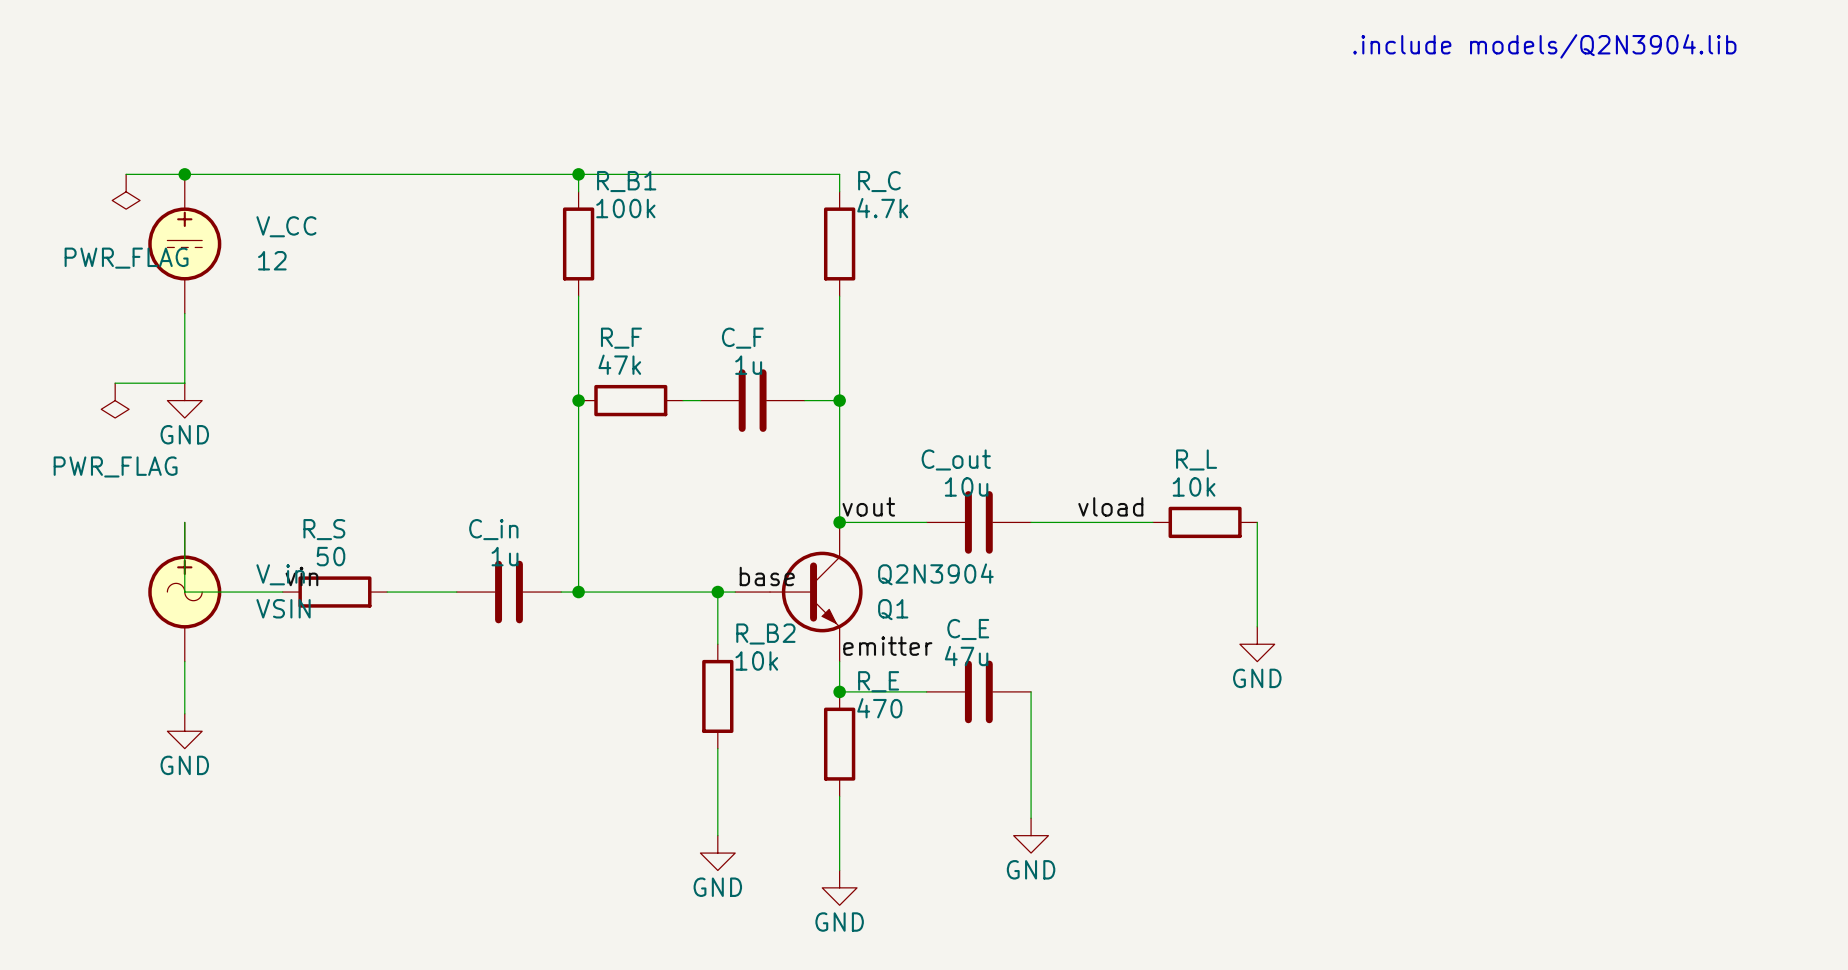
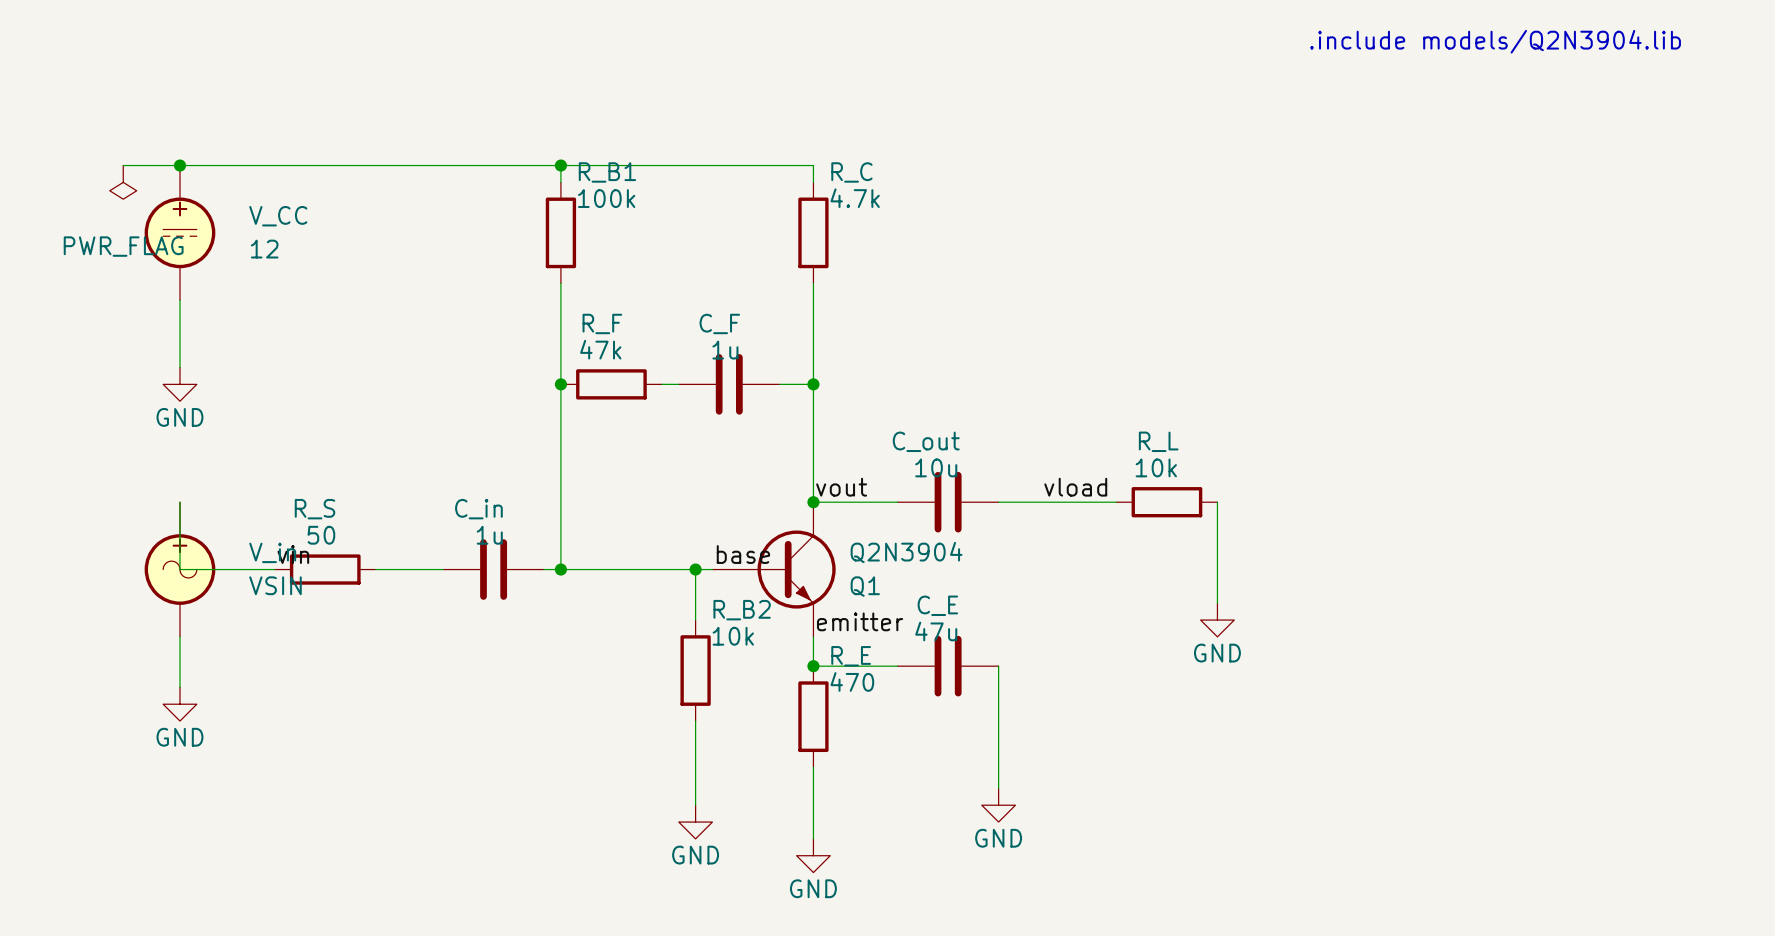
wire: (115, 383) (184, 383) -> none
power symbol: PWR_FLAG (115, 400) -> none

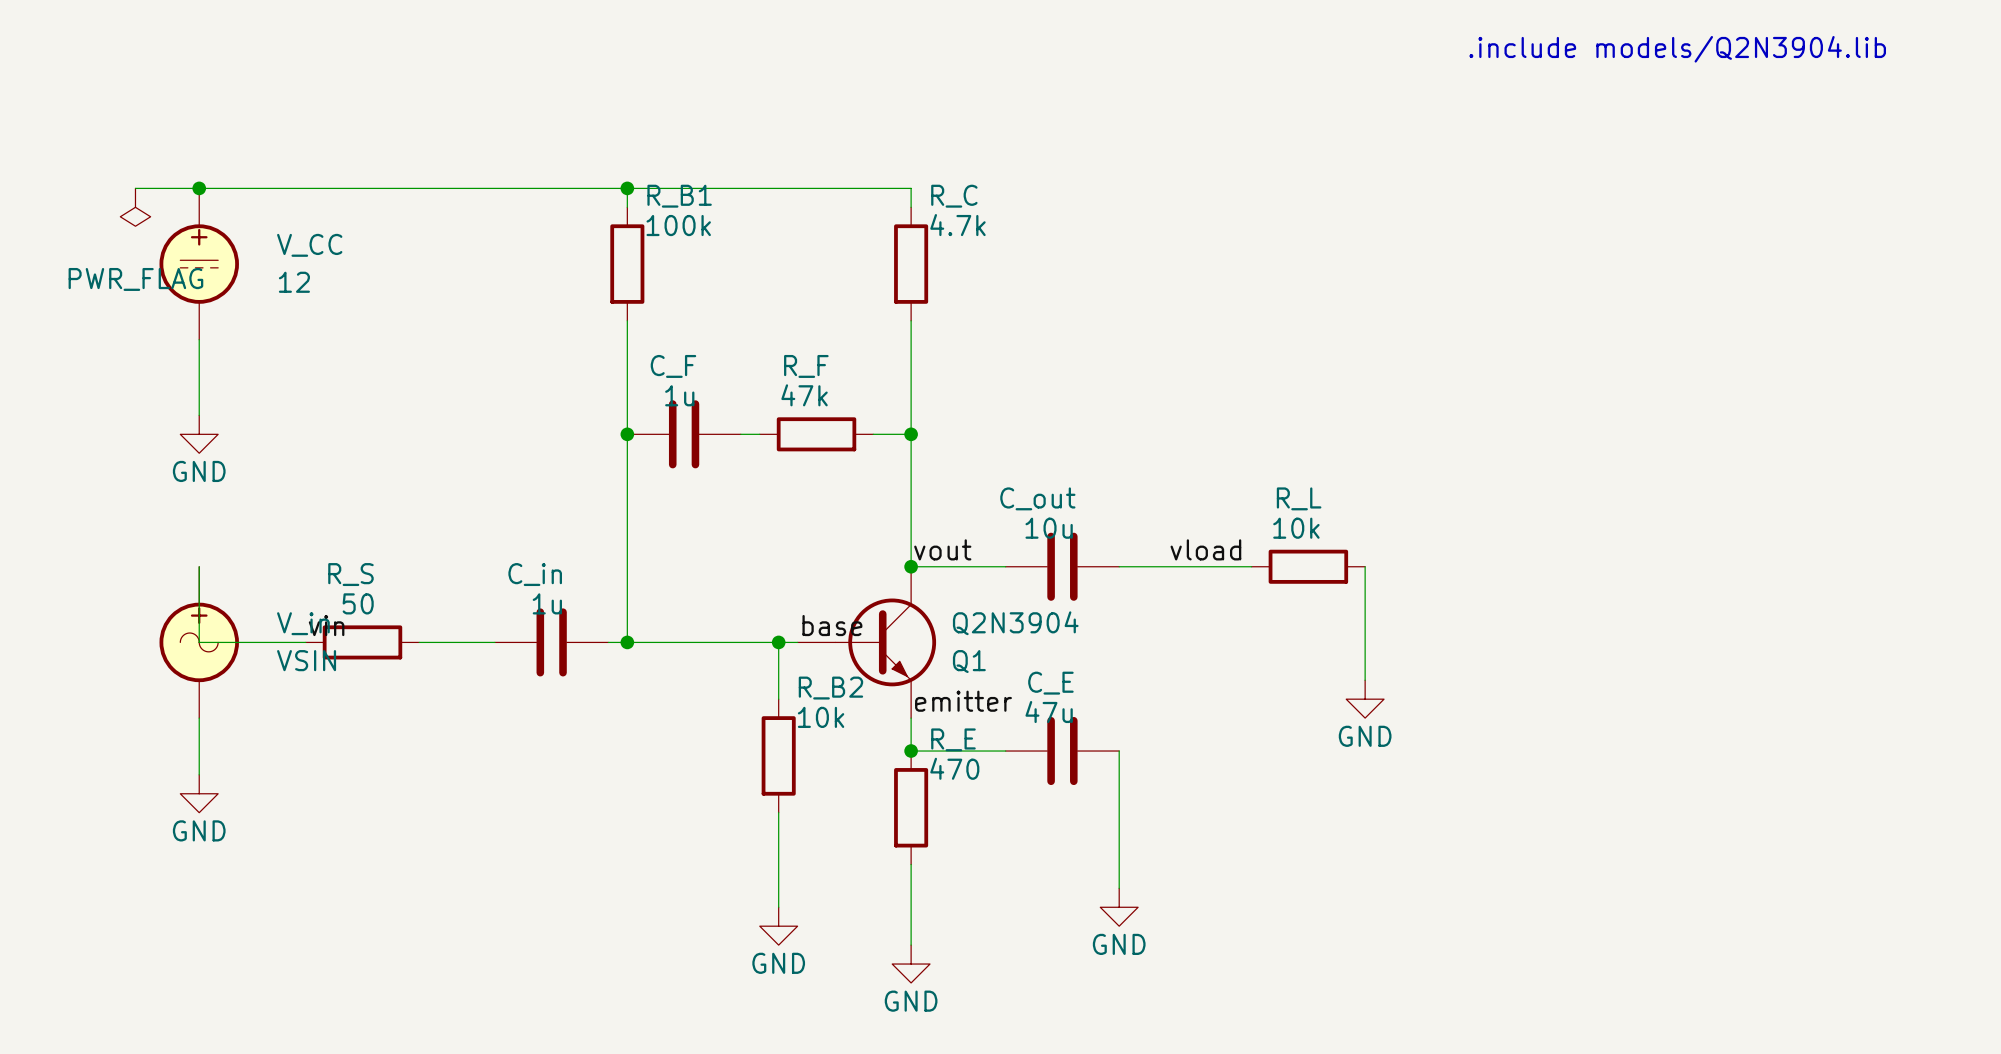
R_F position: (611, 384) -> (816, 434)
C_F position: (729, 384) -> (684, 434)

